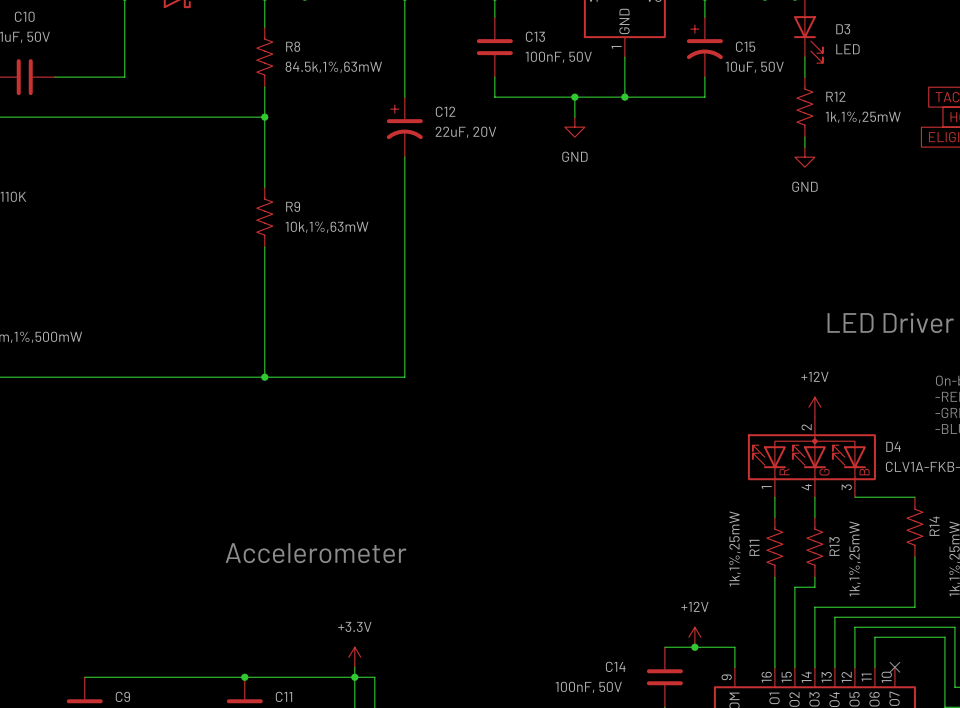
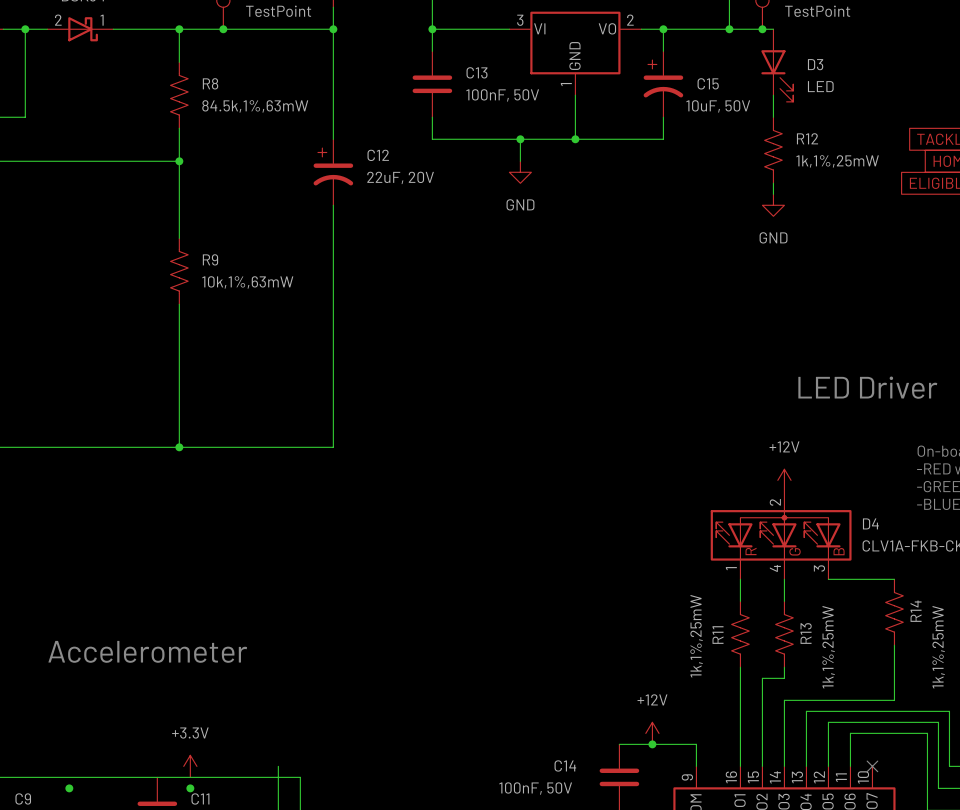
text position: Accelerometer (316, 553) -> Accelerometer (147, 651)
power symbol position: +3.3V (354, 657) -> +3.3V (190, 766)
junction position: (244, 677) -> (190, 788)
junction: (354, 677) -> none
junction: none -> (69, 788)

